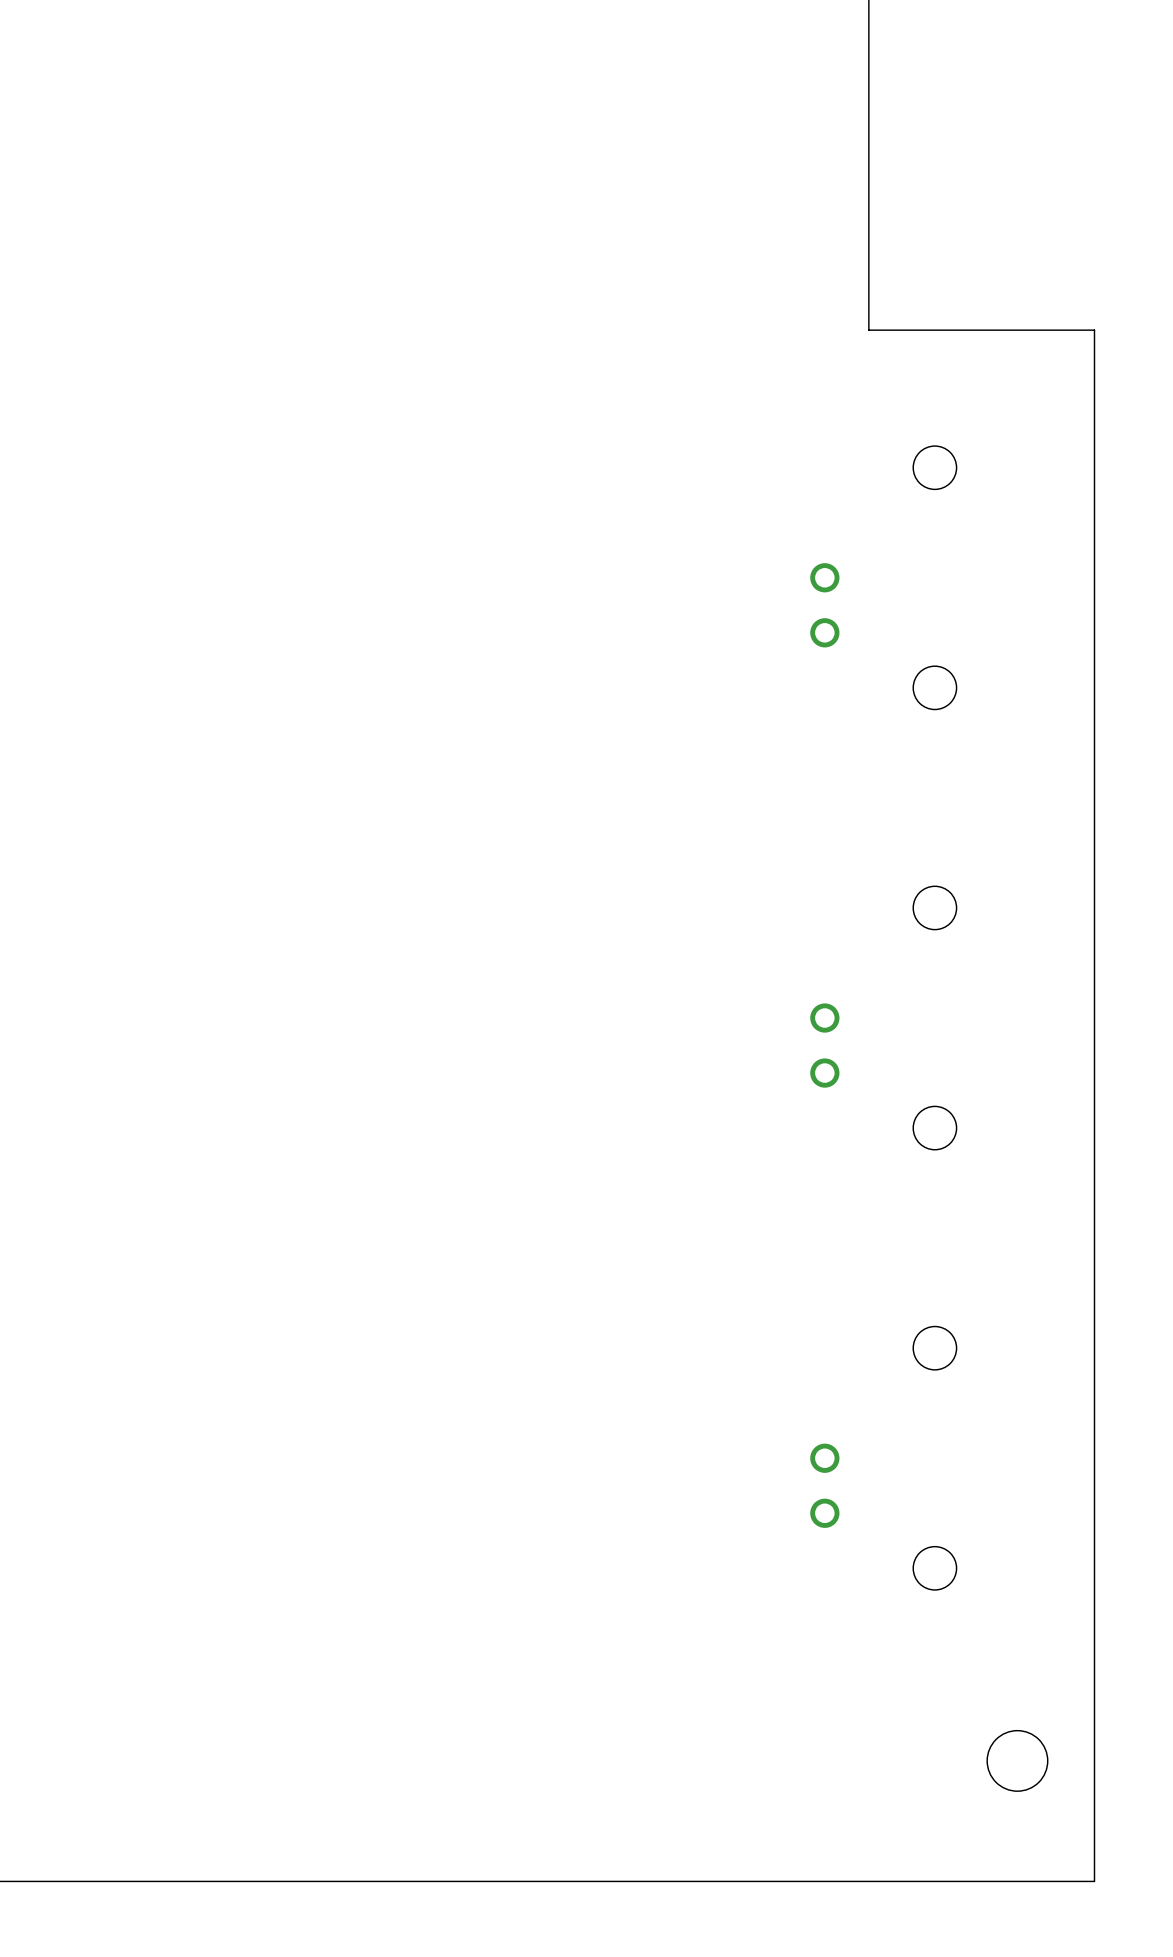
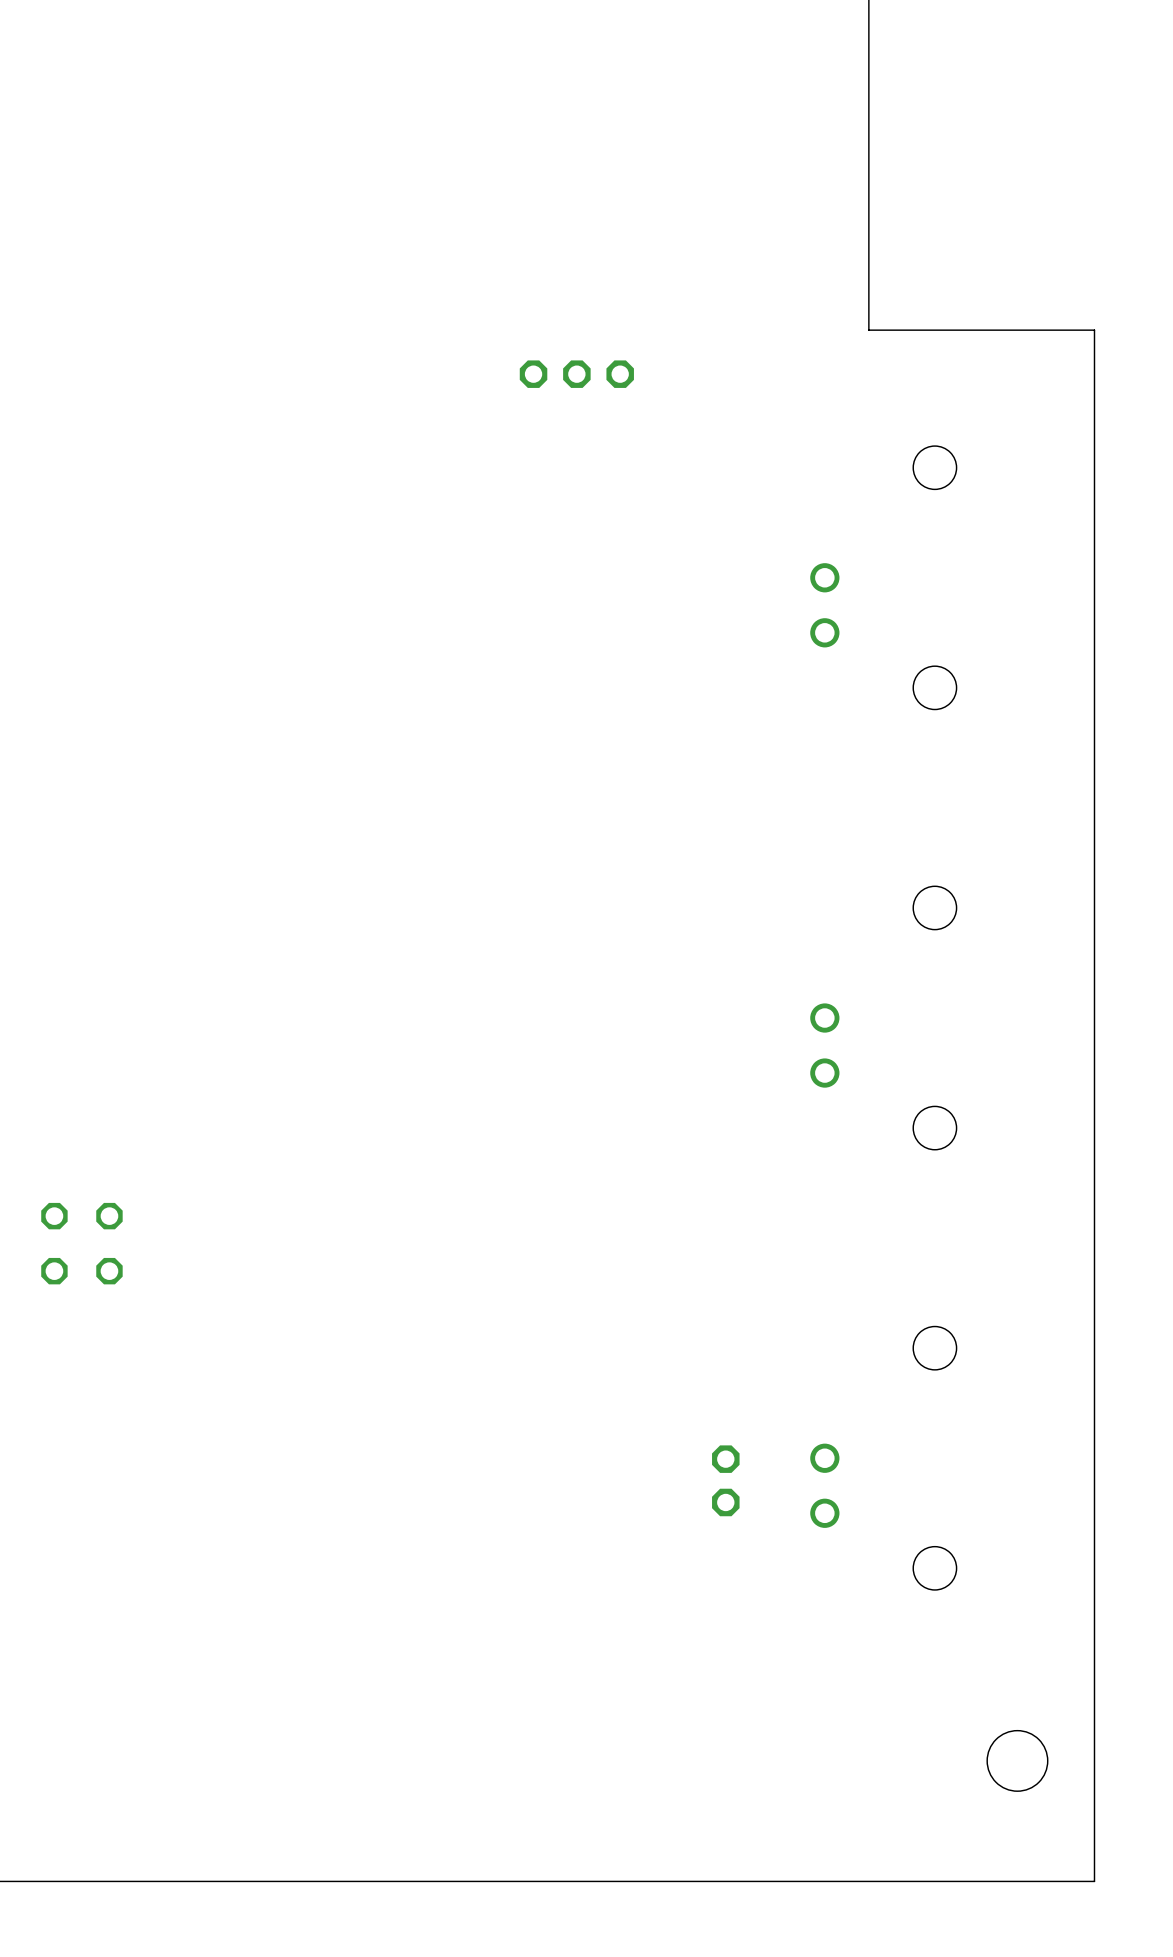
part: none -> (576, 374)
part: none -> (81, 1243)
part: none -> (725, 1480)

